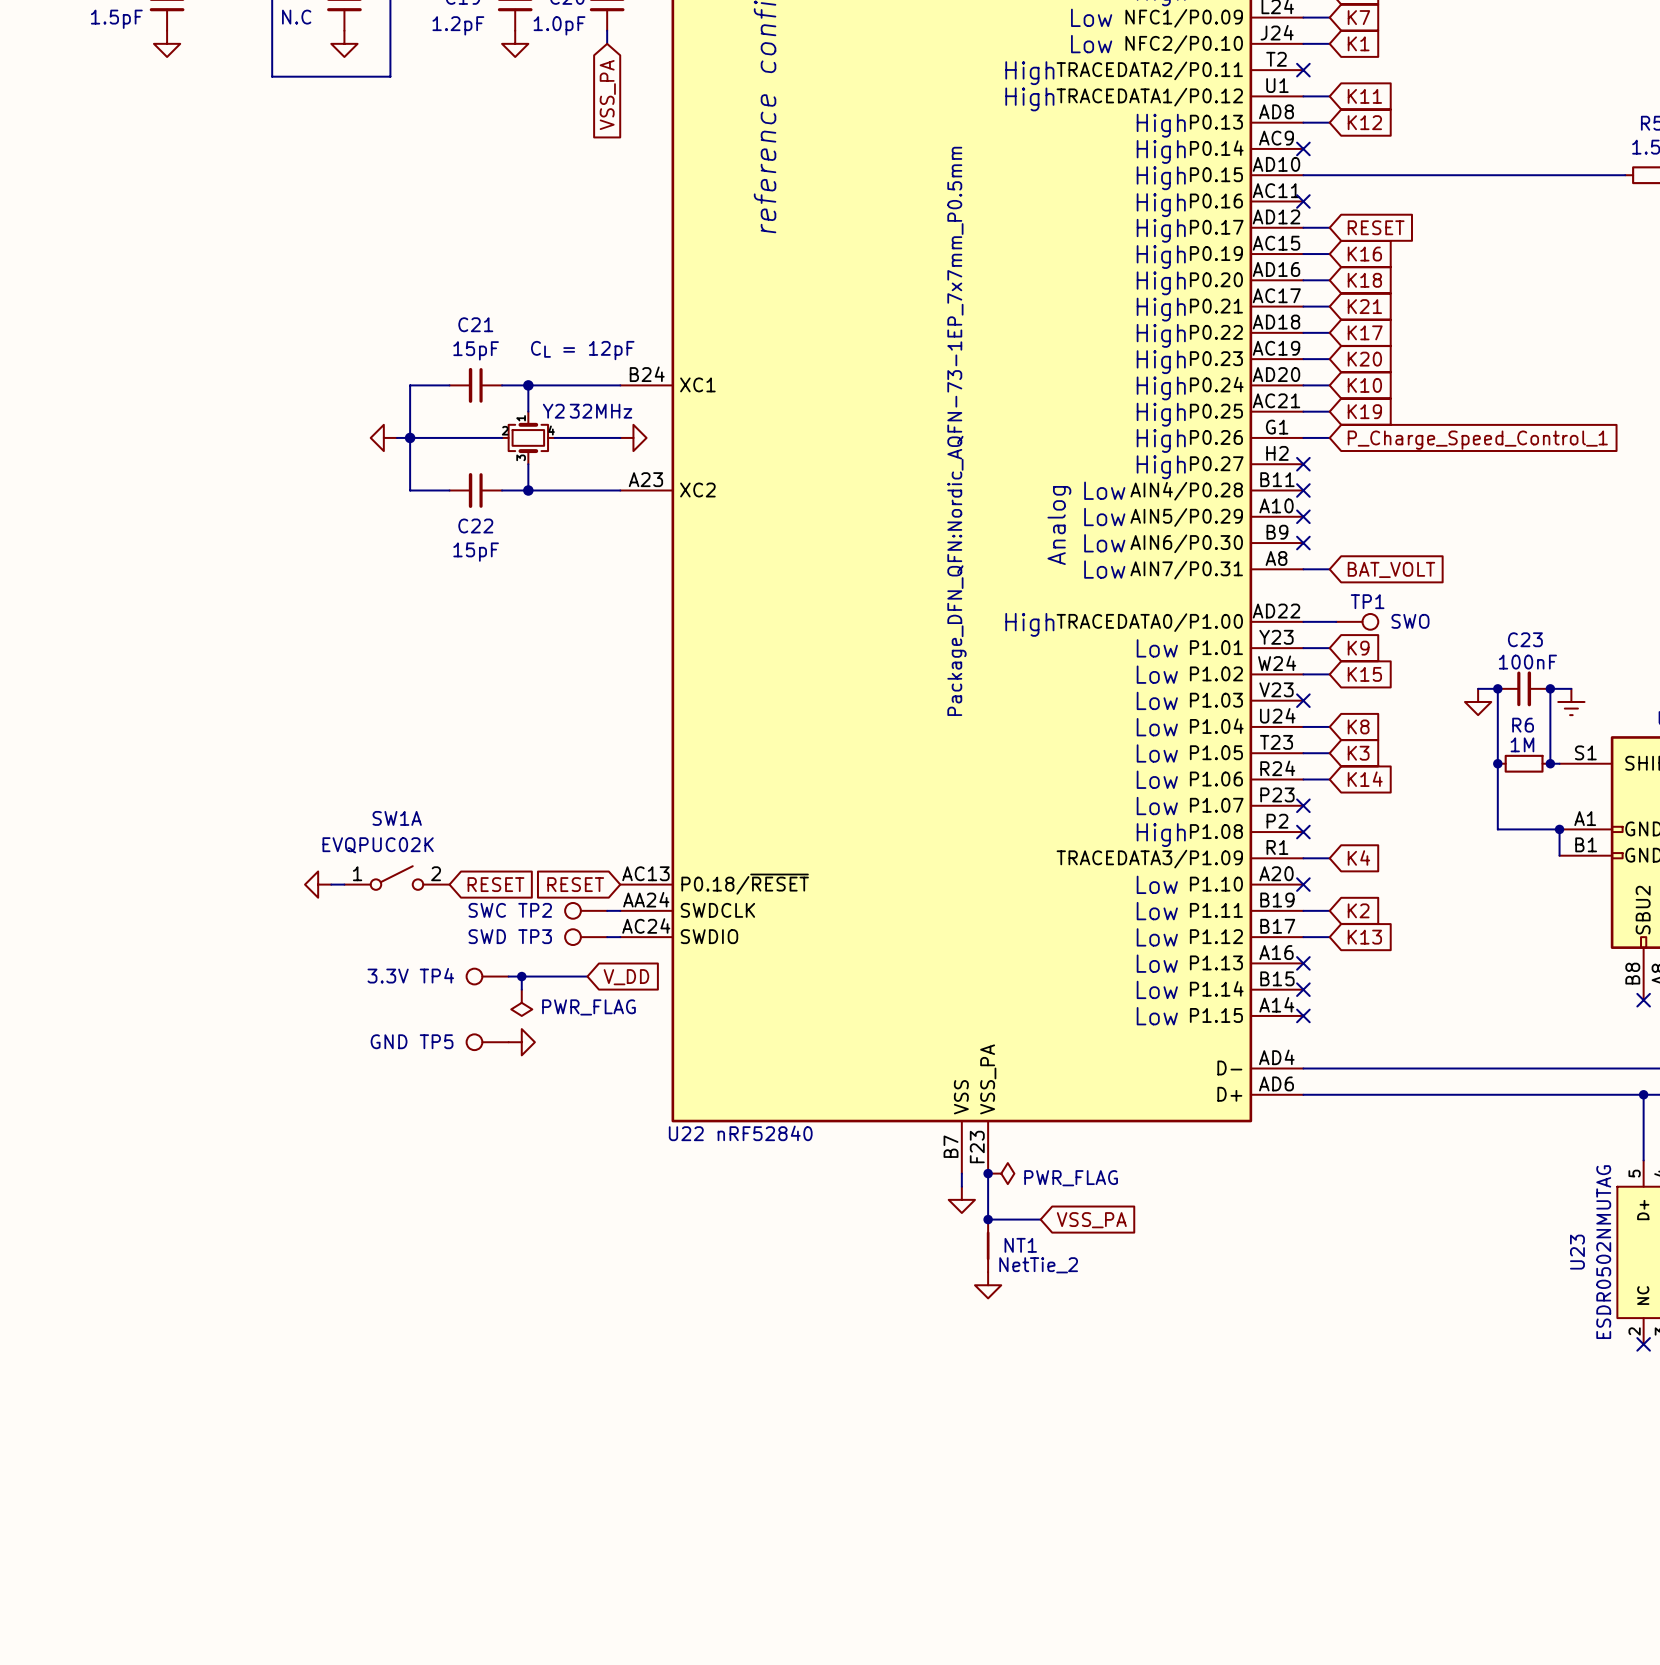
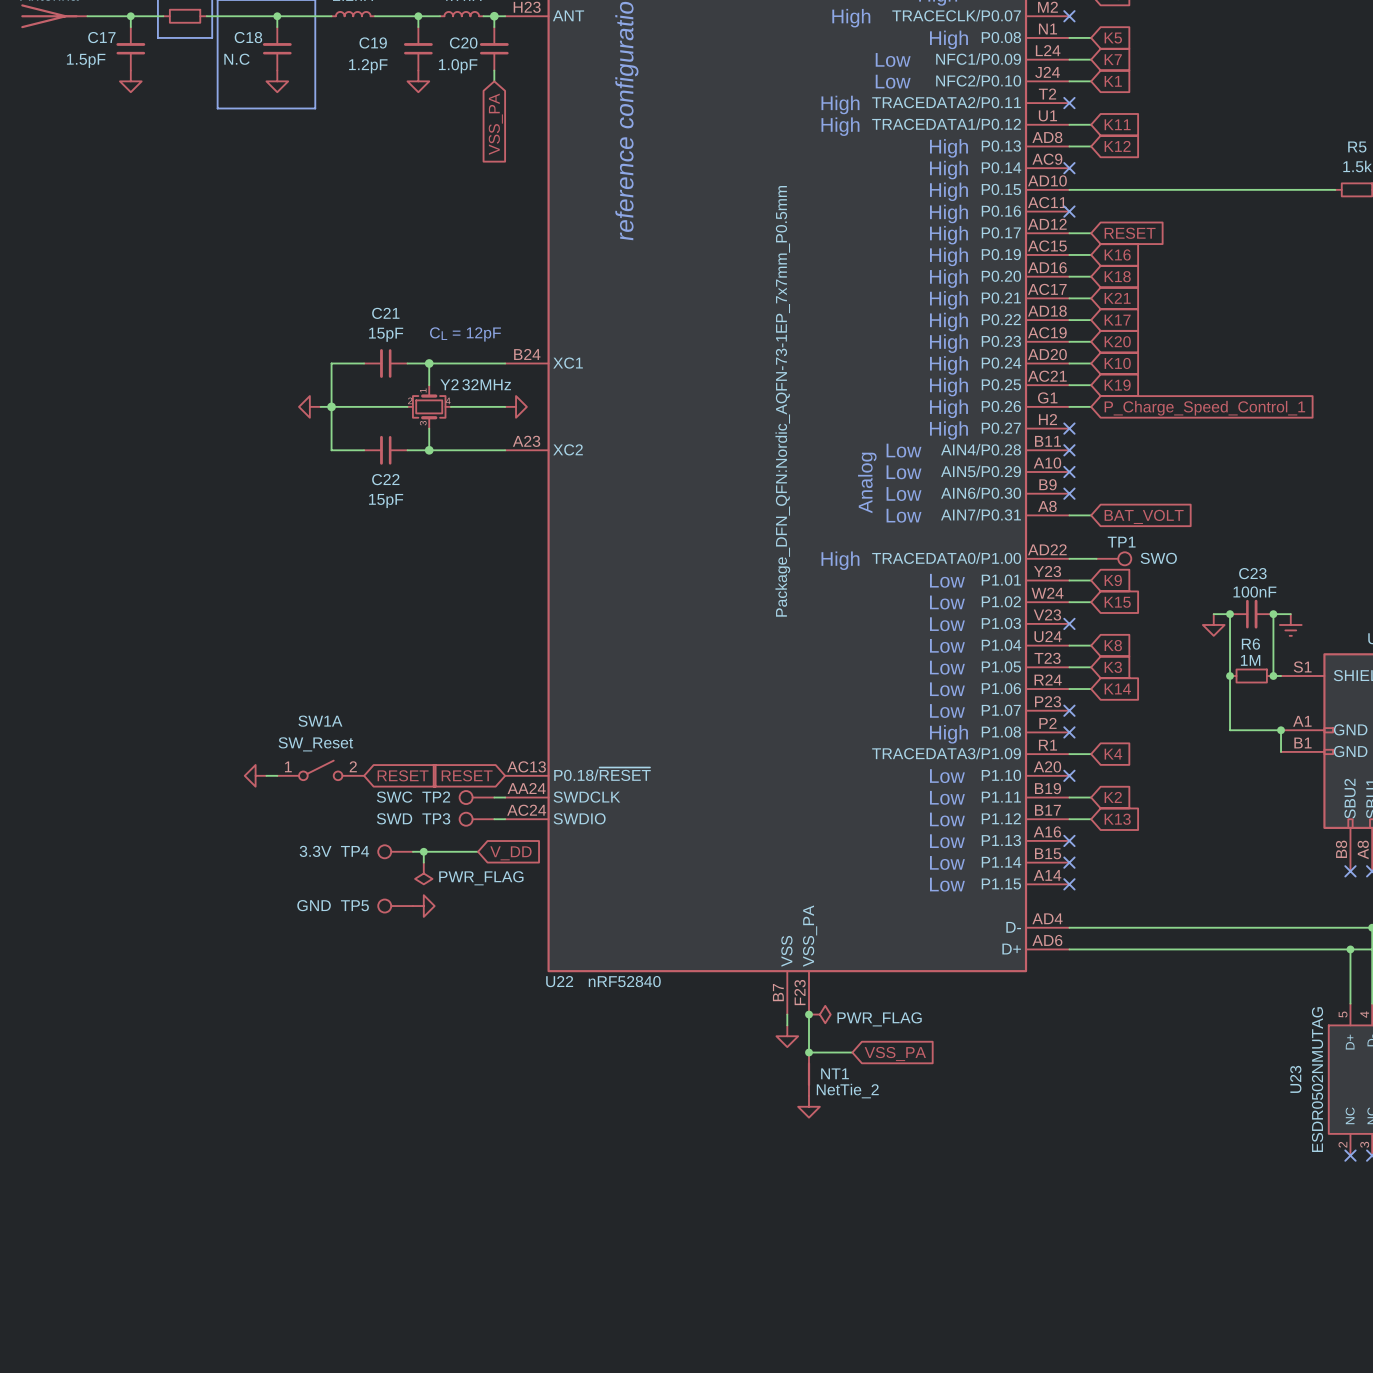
SW1A value: EVQPUC02K (378, 845) -> SW_Reset (315, 744)

